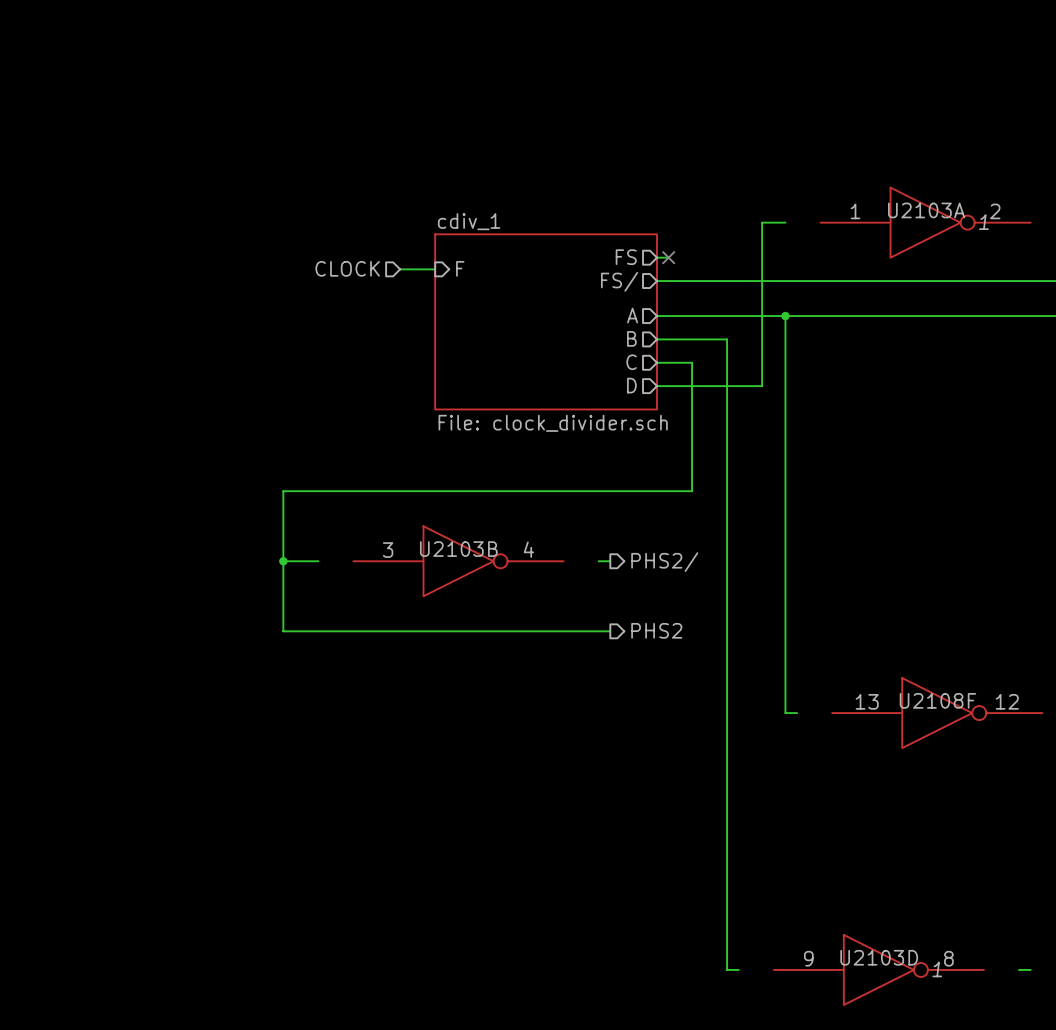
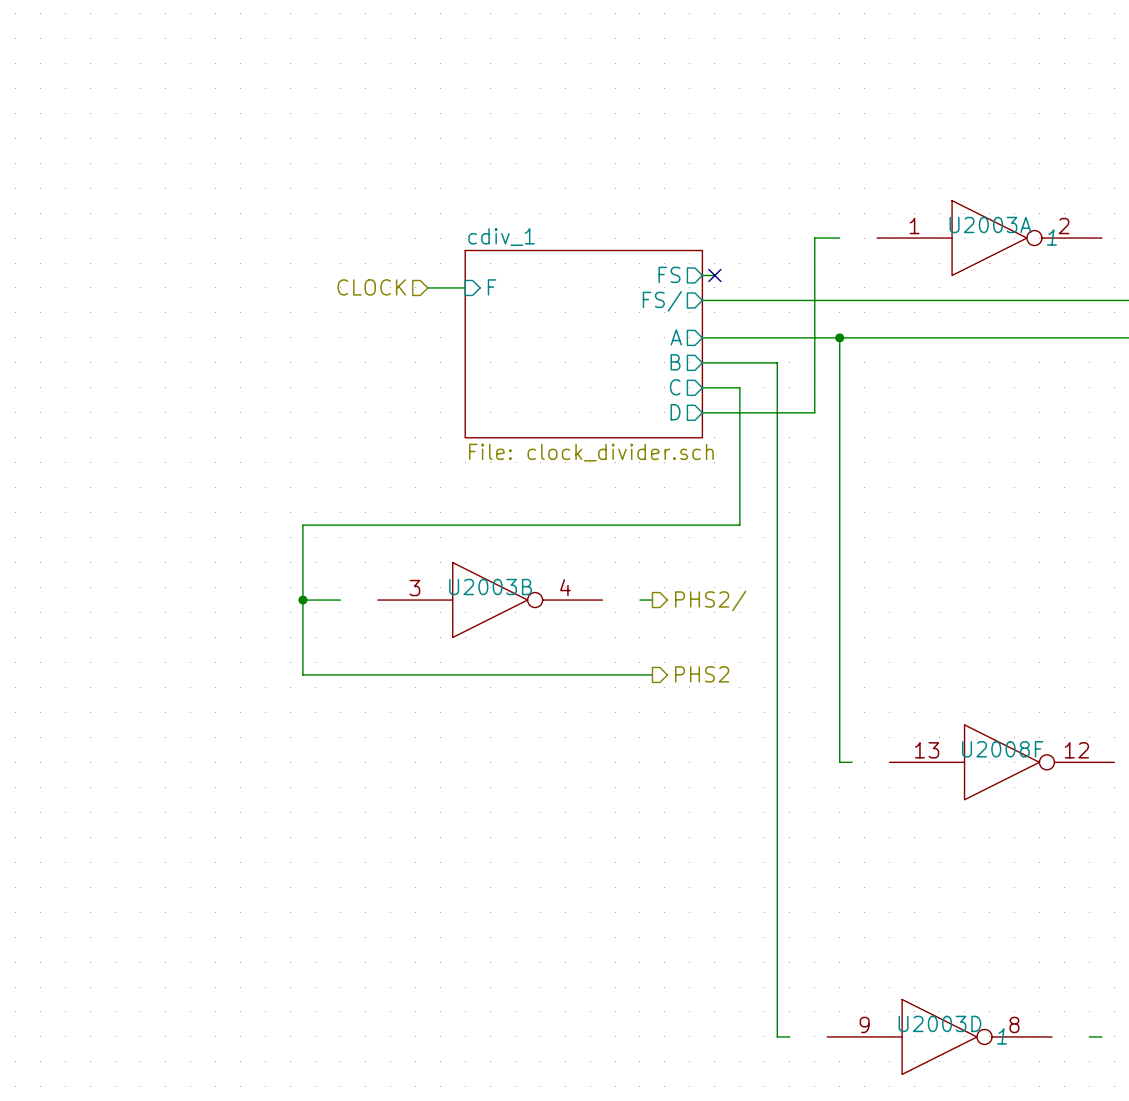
U2103A name: U2103A (926, 210) -> U2003A (990, 224)
U2103B name: U2103B (458, 549) -> U2003B (490, 587)
U2108F name: U2108F (937, 700) -> U2008F (1002, 749)
U2103D name: U2103D (879, 957) -> U2003D (939, 1023)

